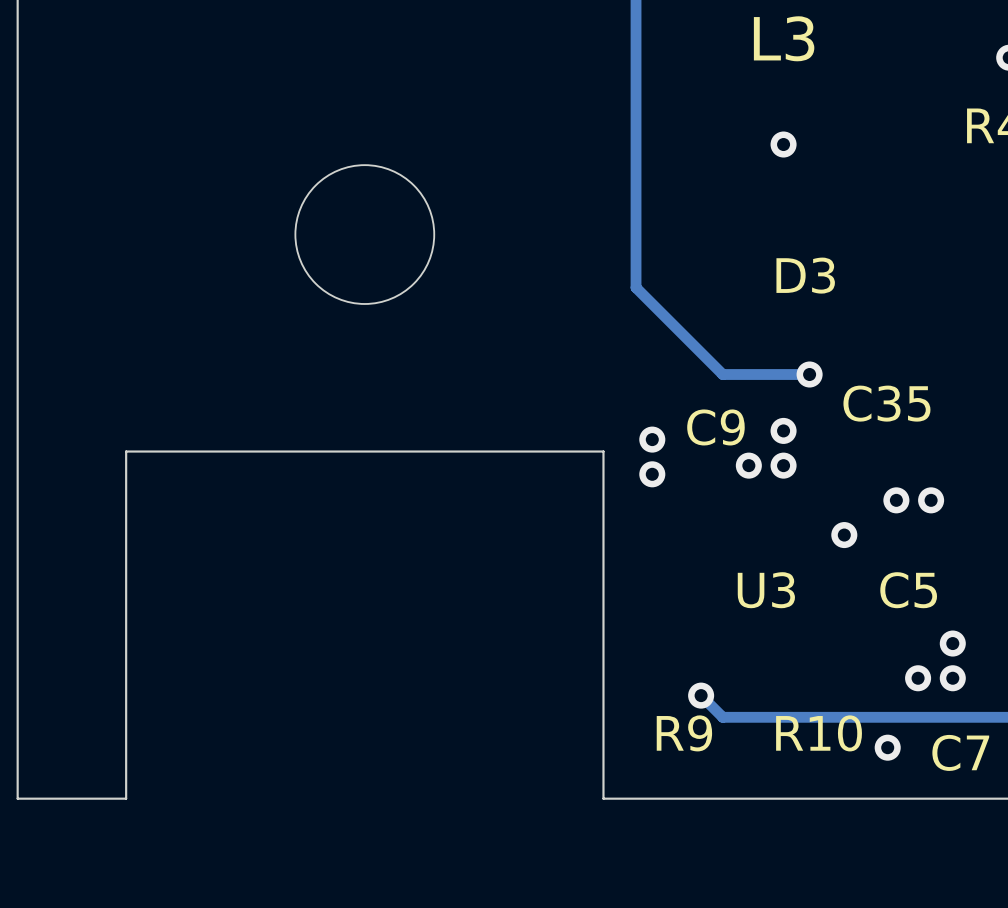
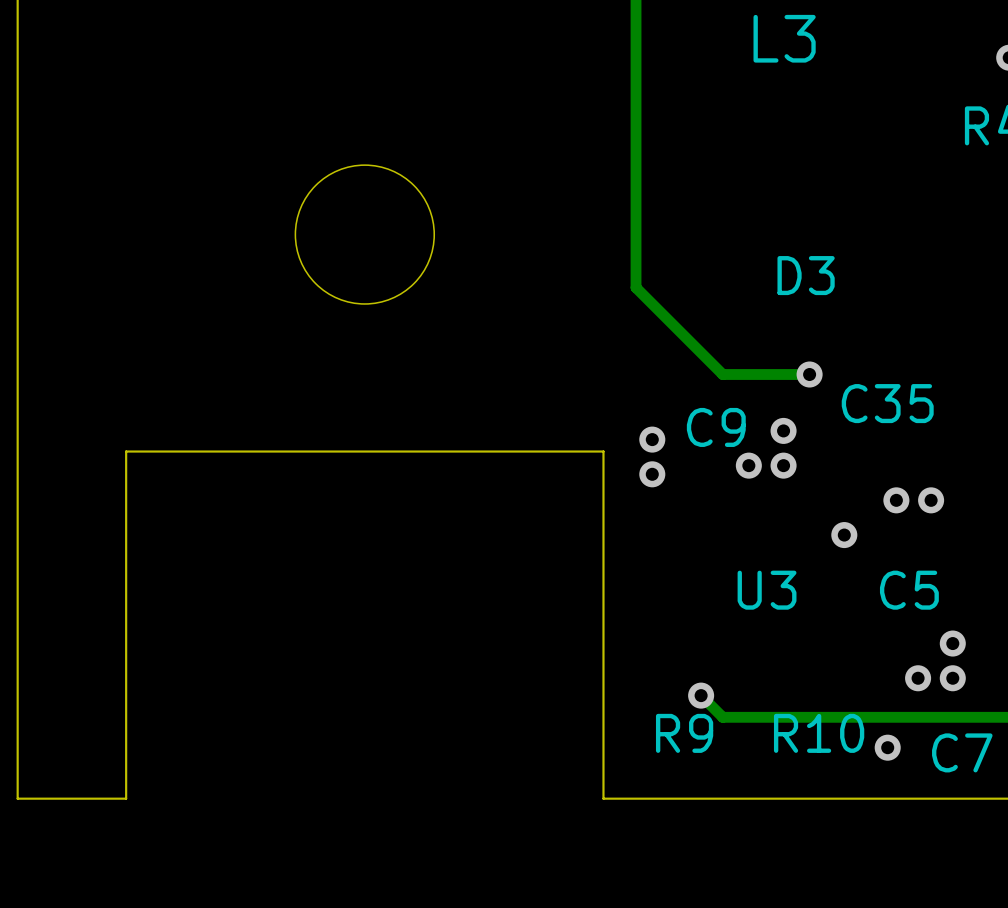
via: (783, 144) -> none

